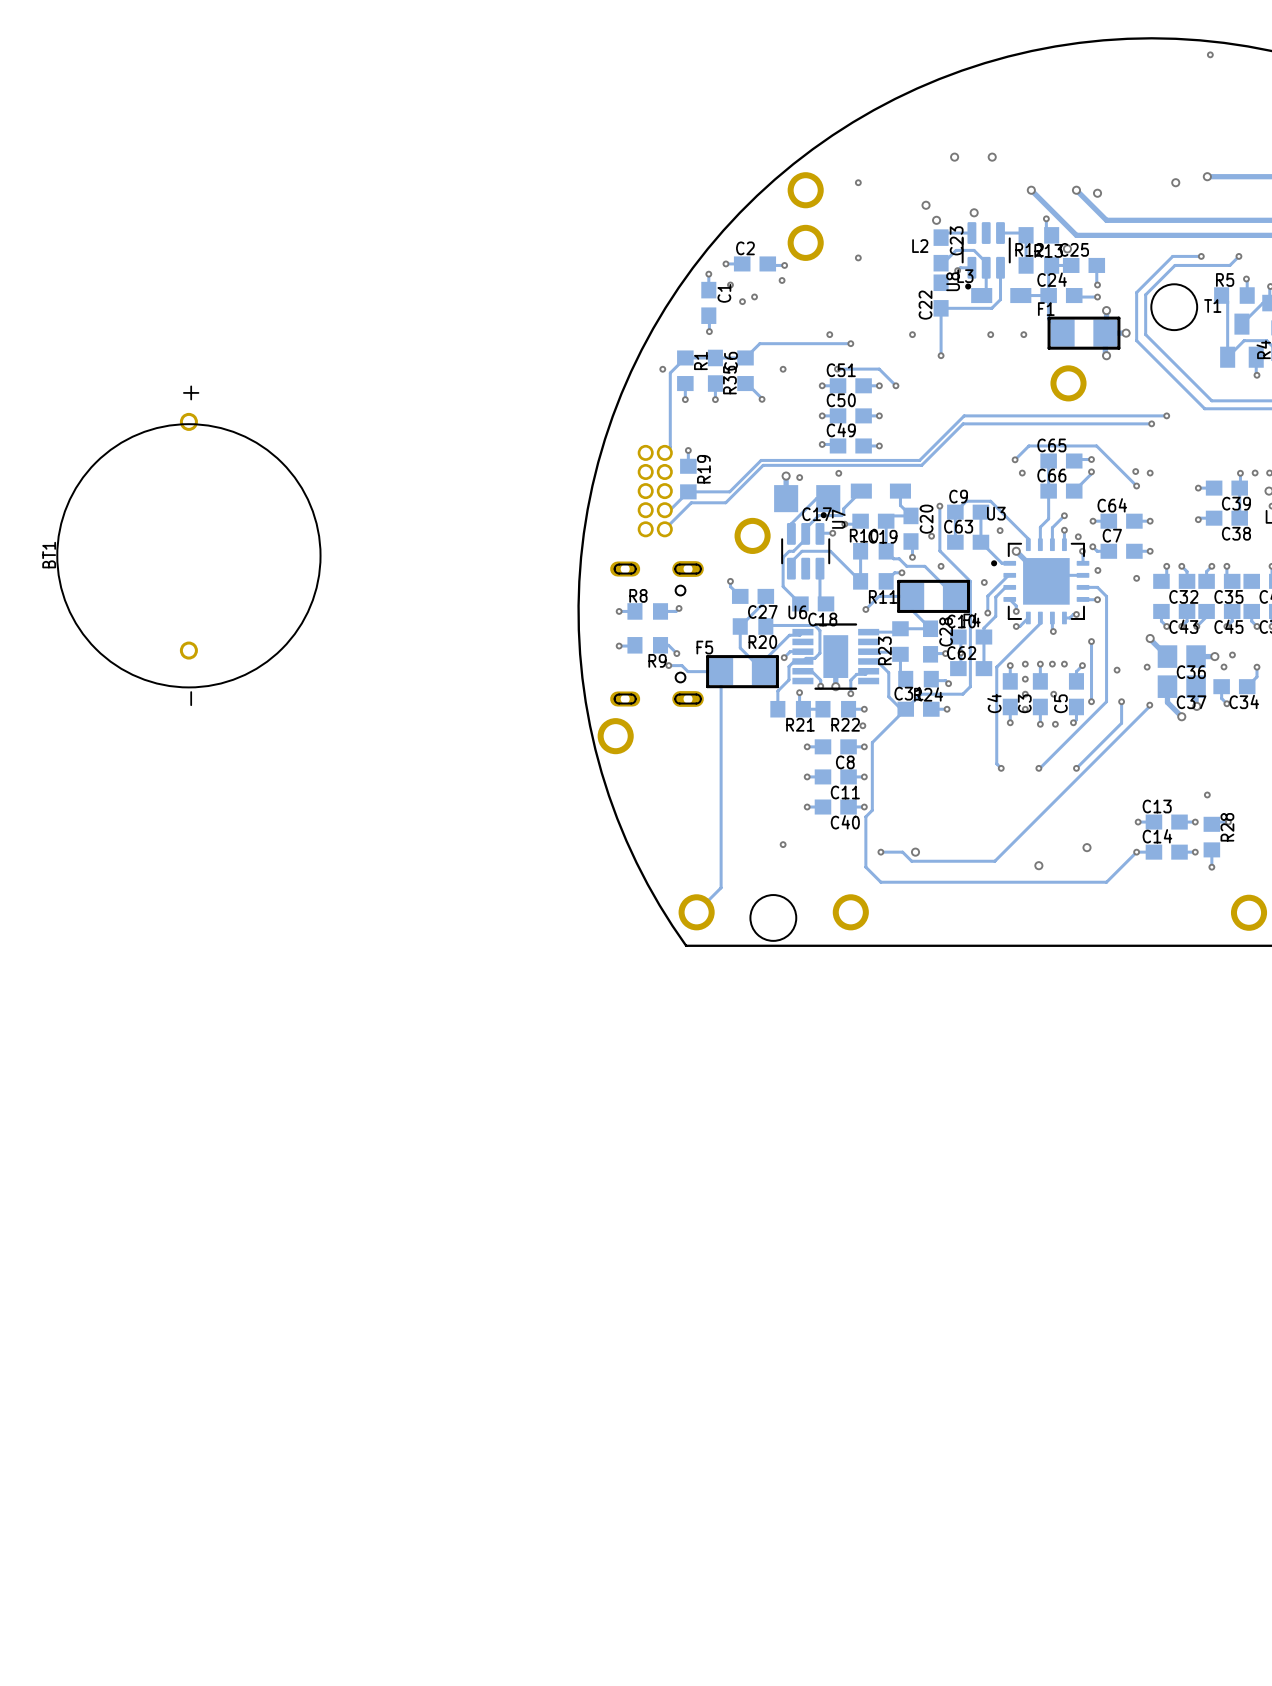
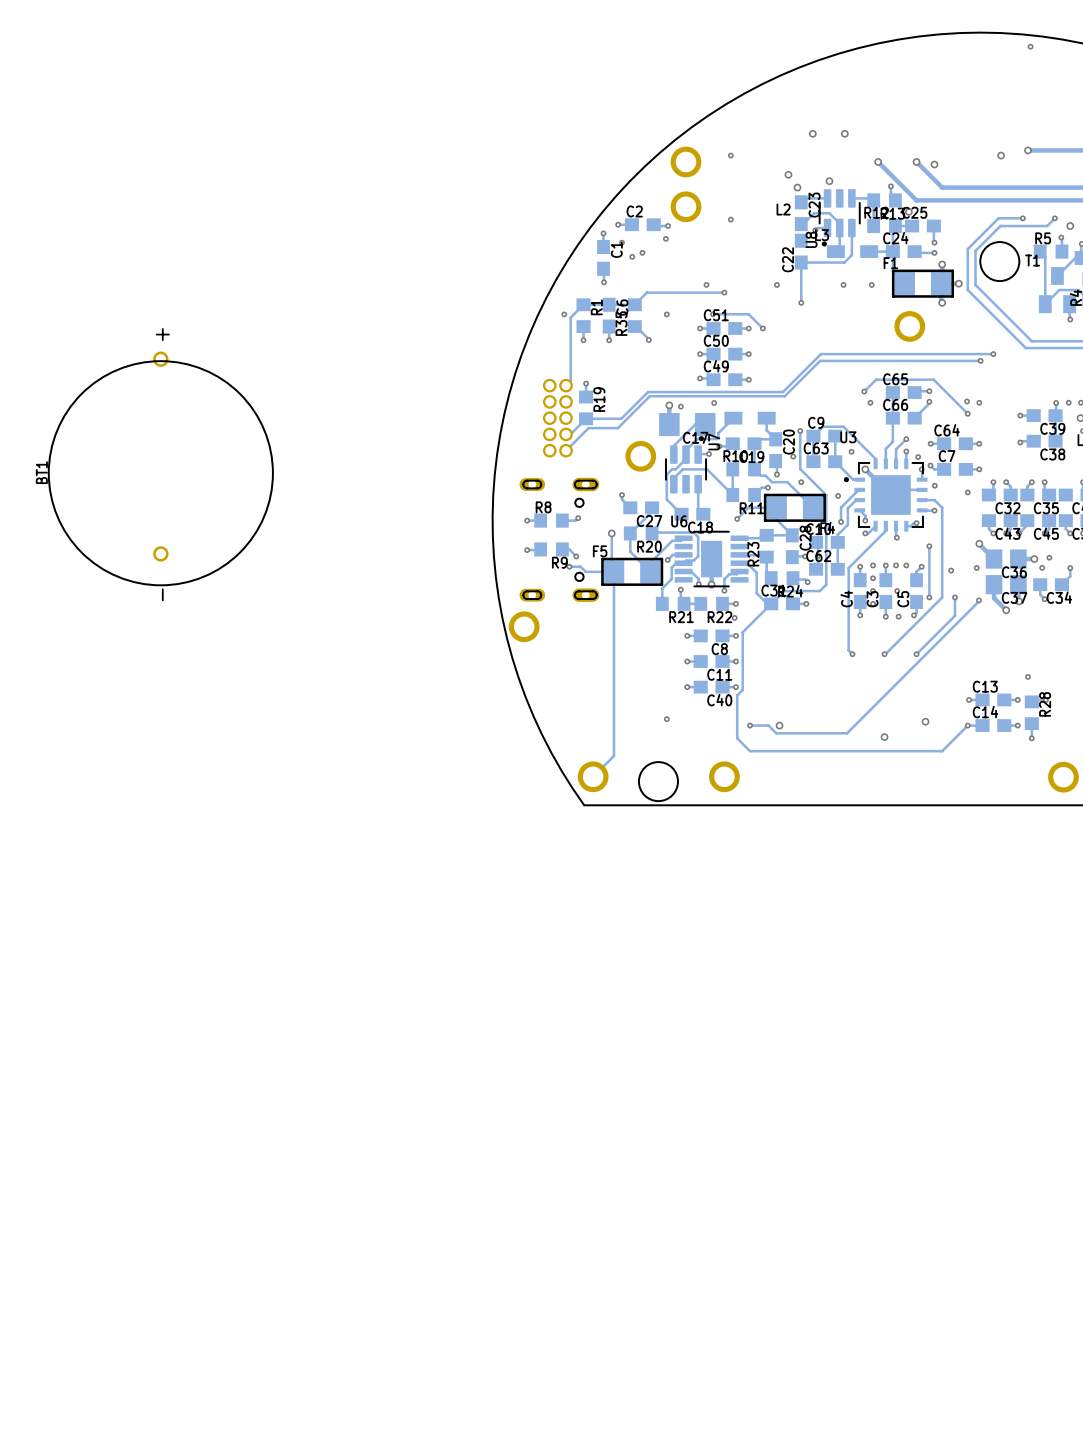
via: none -> (1070, 226)
track: none -> (611, 533) (611, 569) (613, 571)
via: none -> (611, 533)

